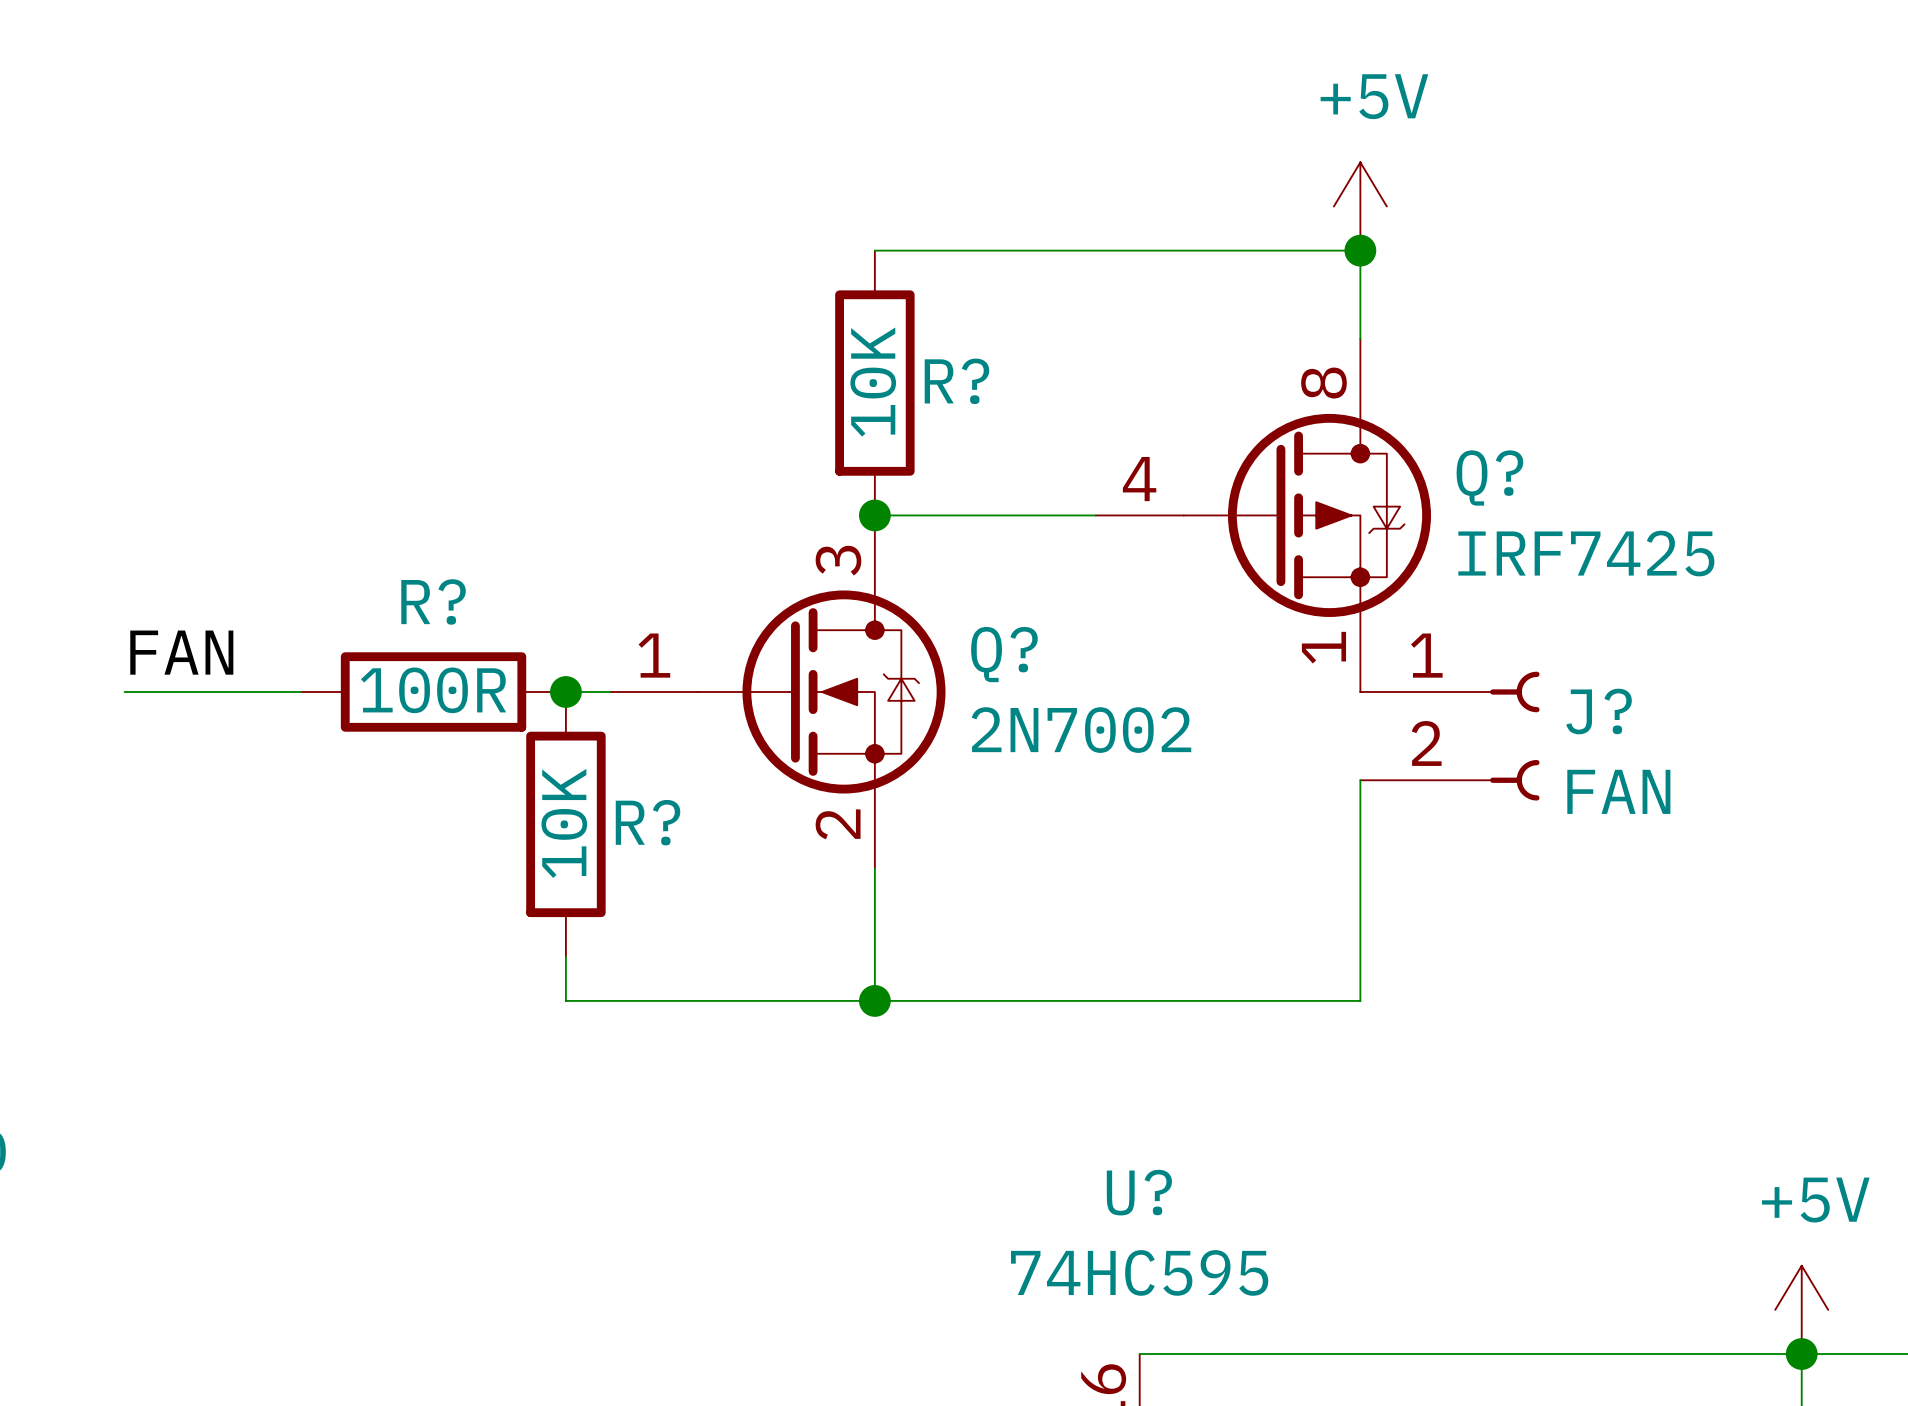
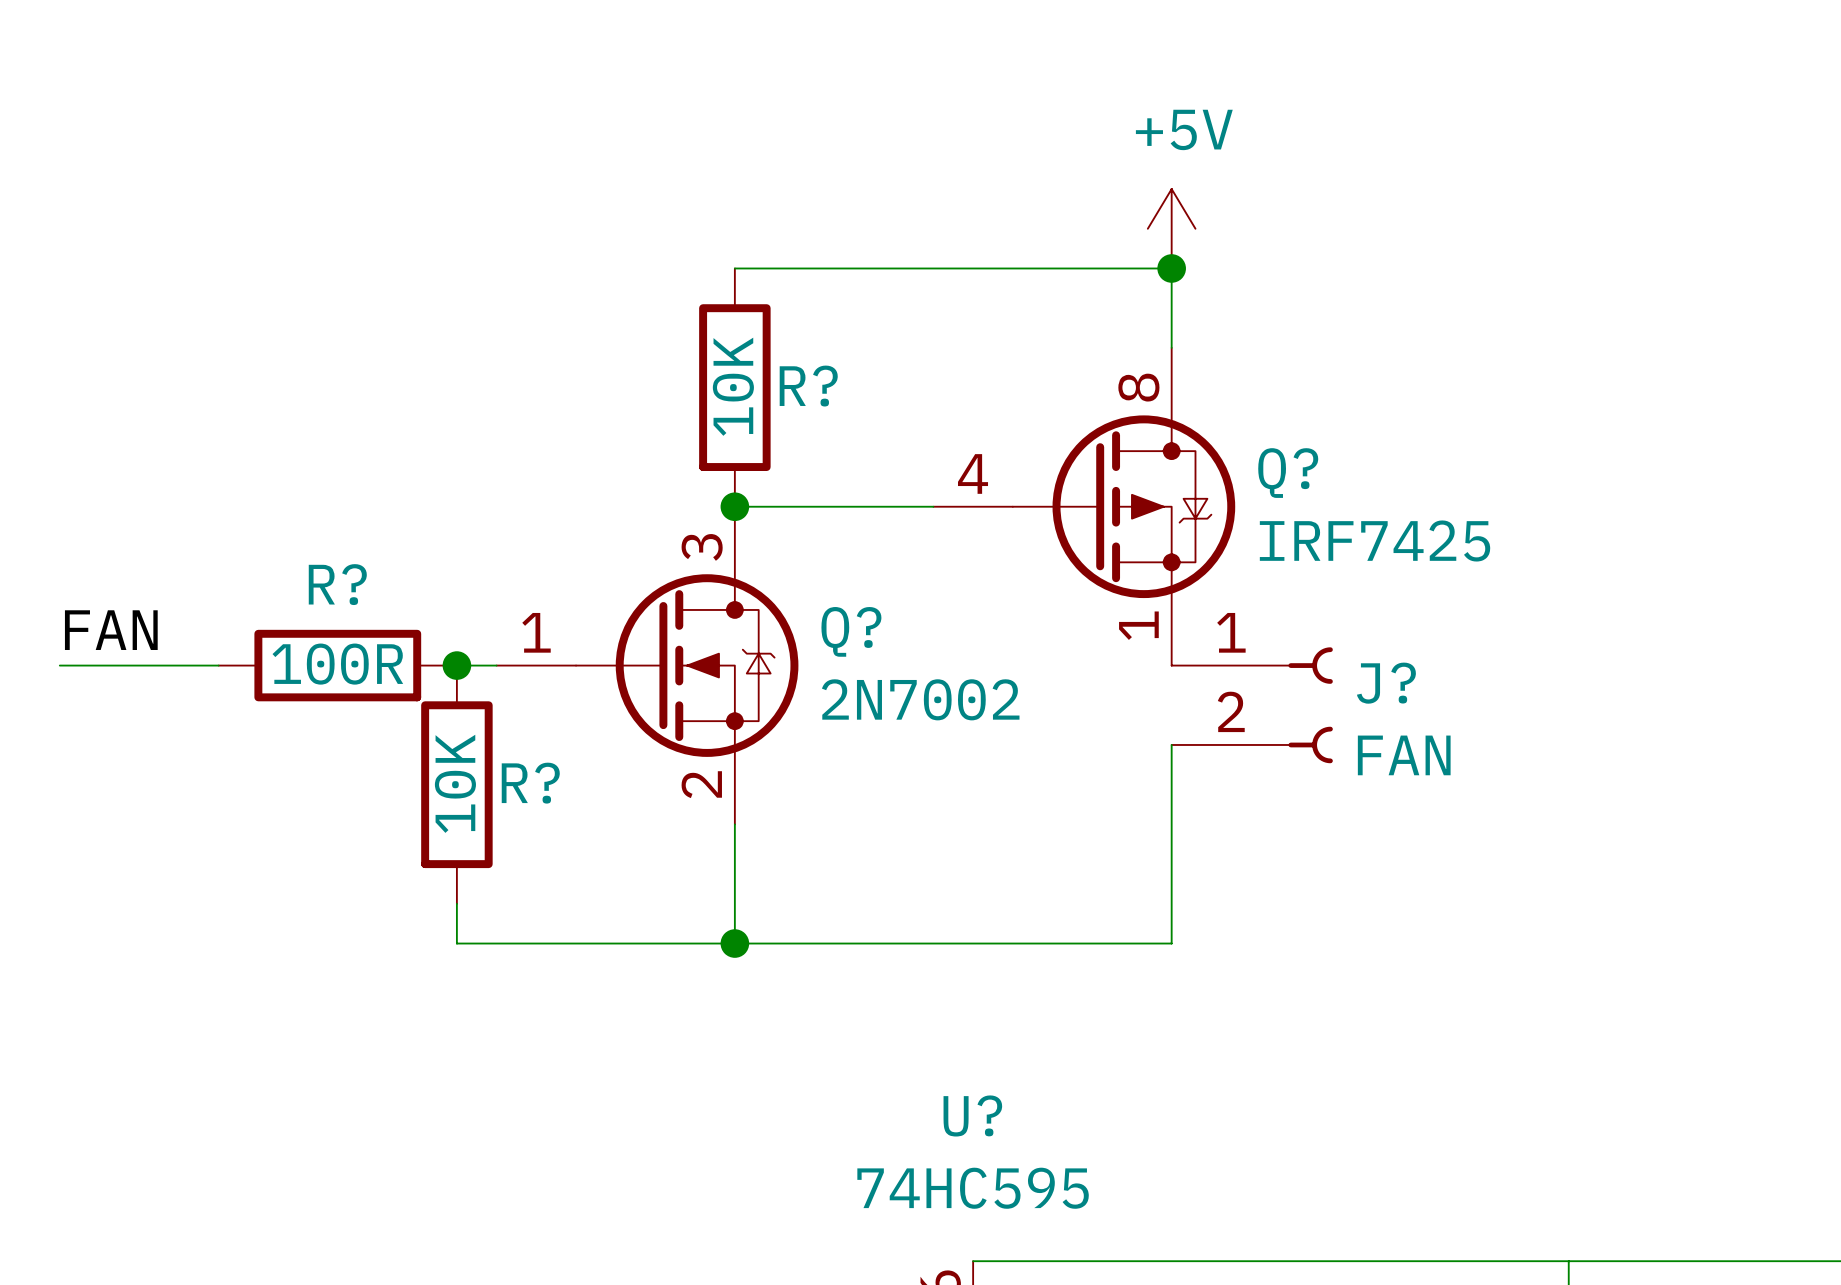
power symbol: +5V (1801, 1309) -> none
junction: (1801, 1354) -> none

